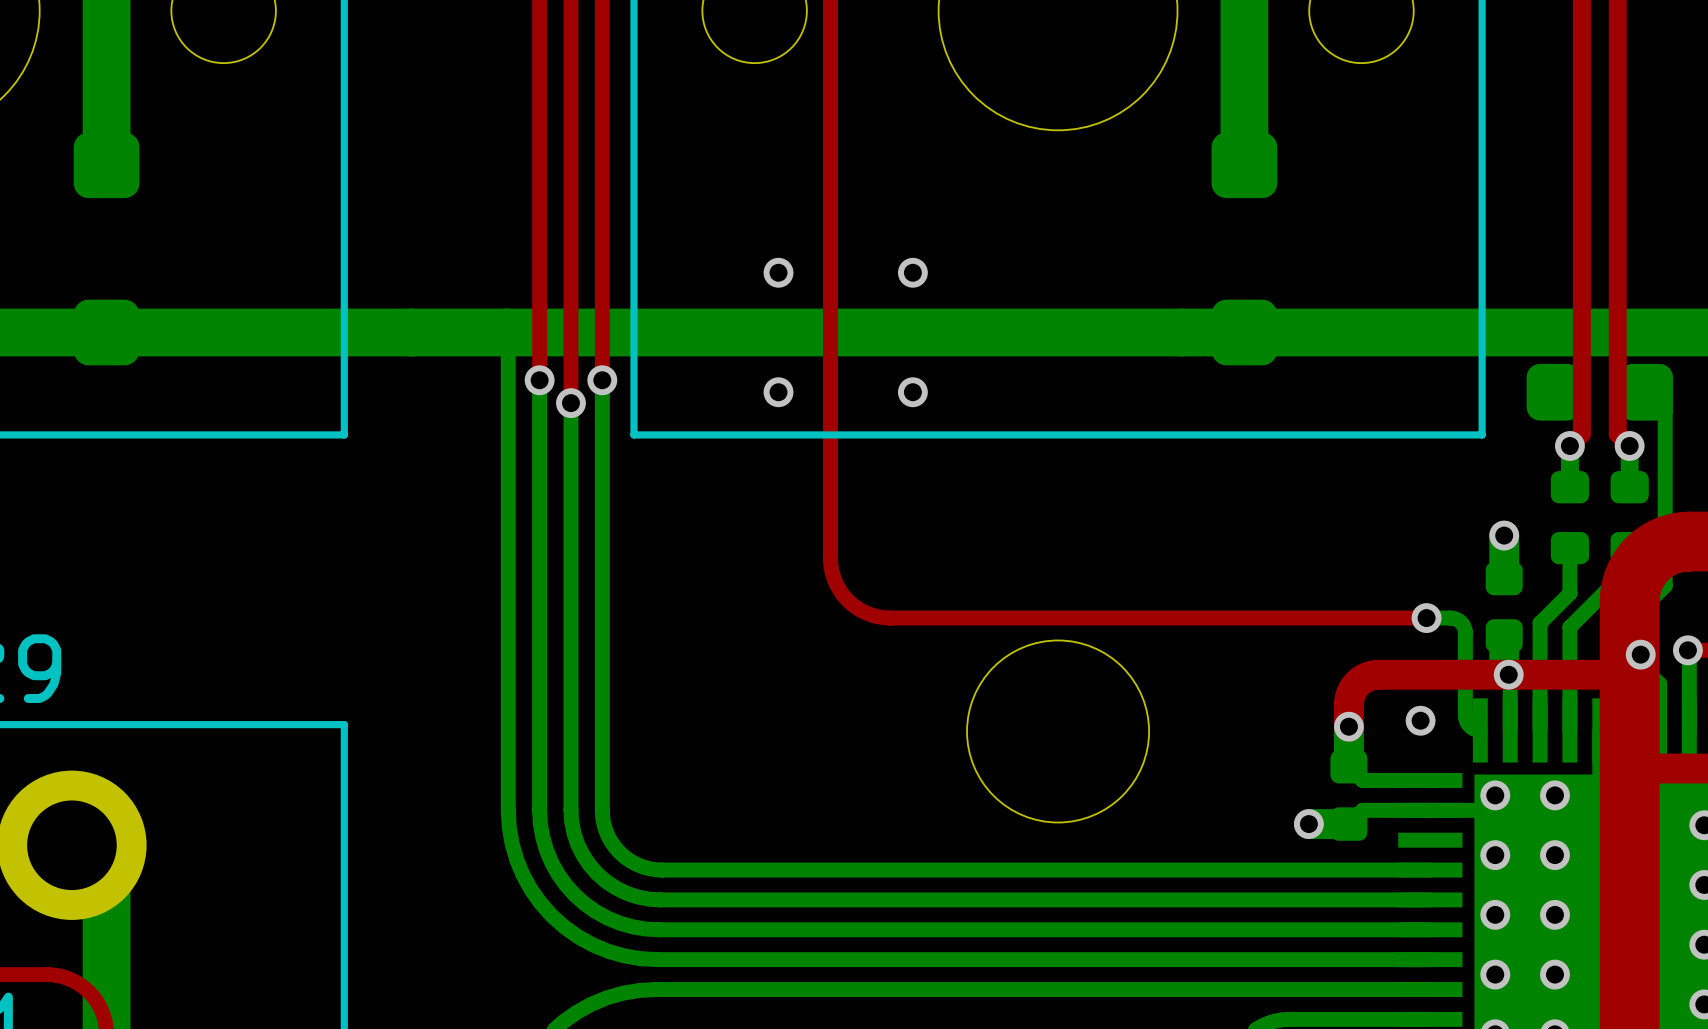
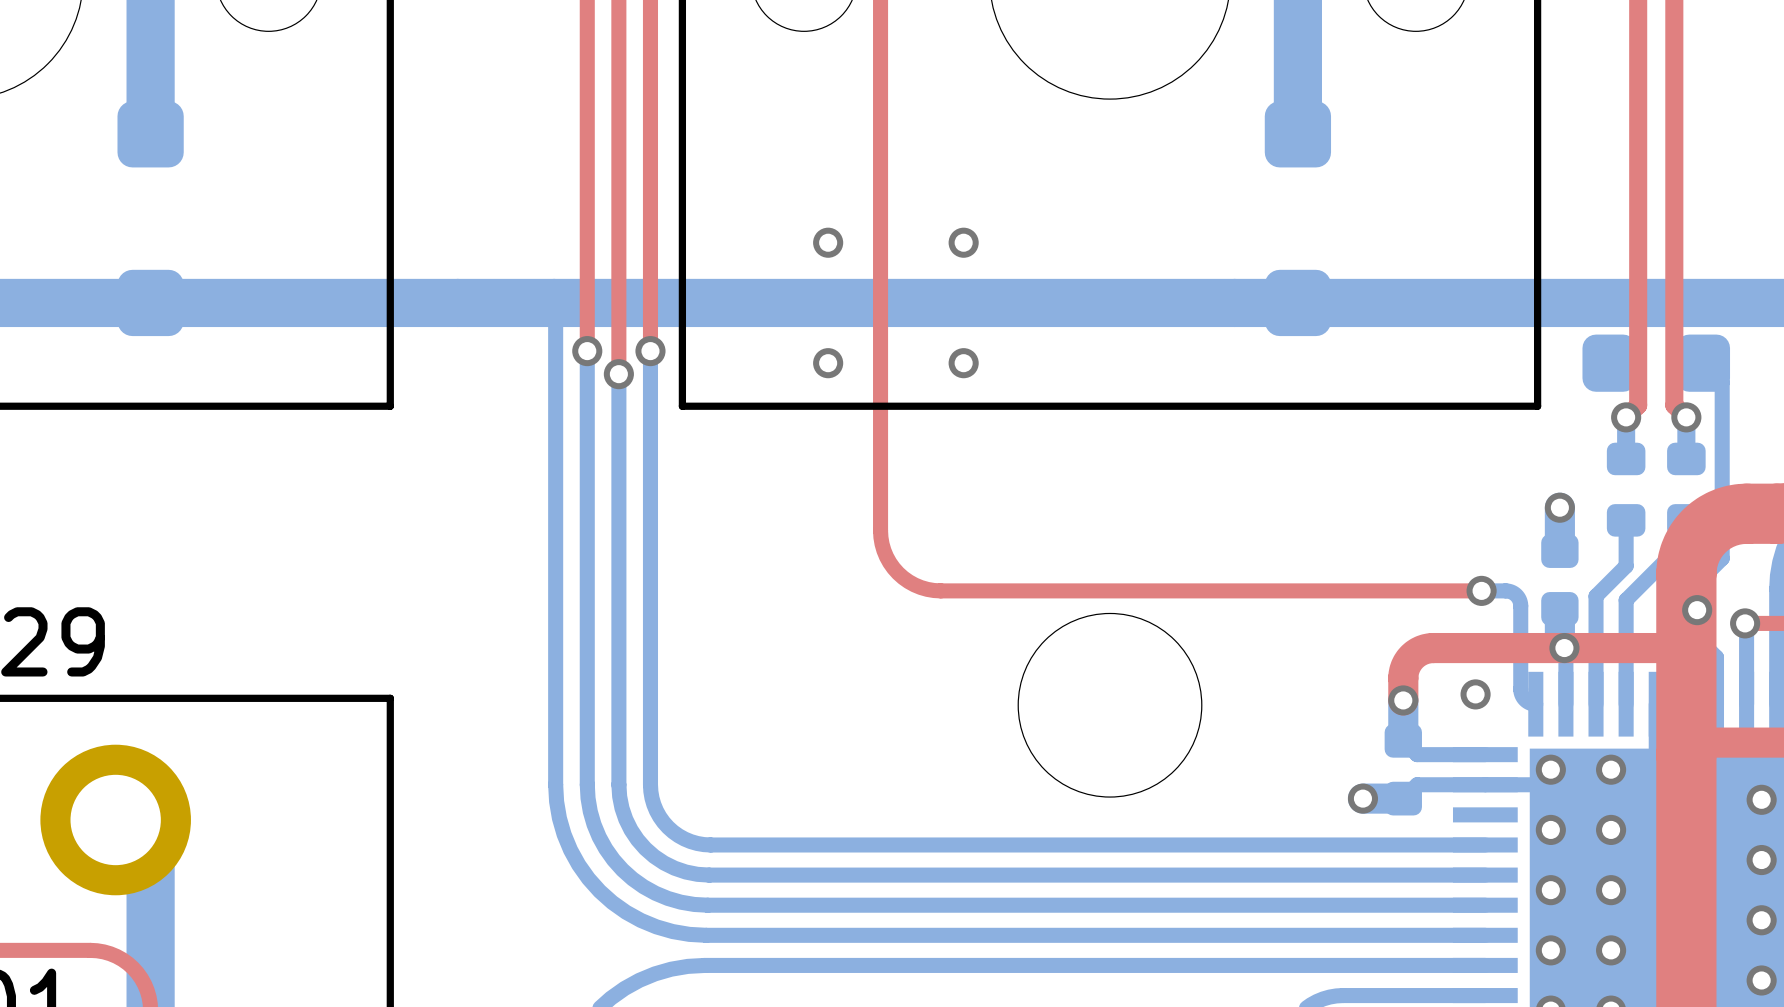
via position: (1640, 654) -> (1697, 610)

